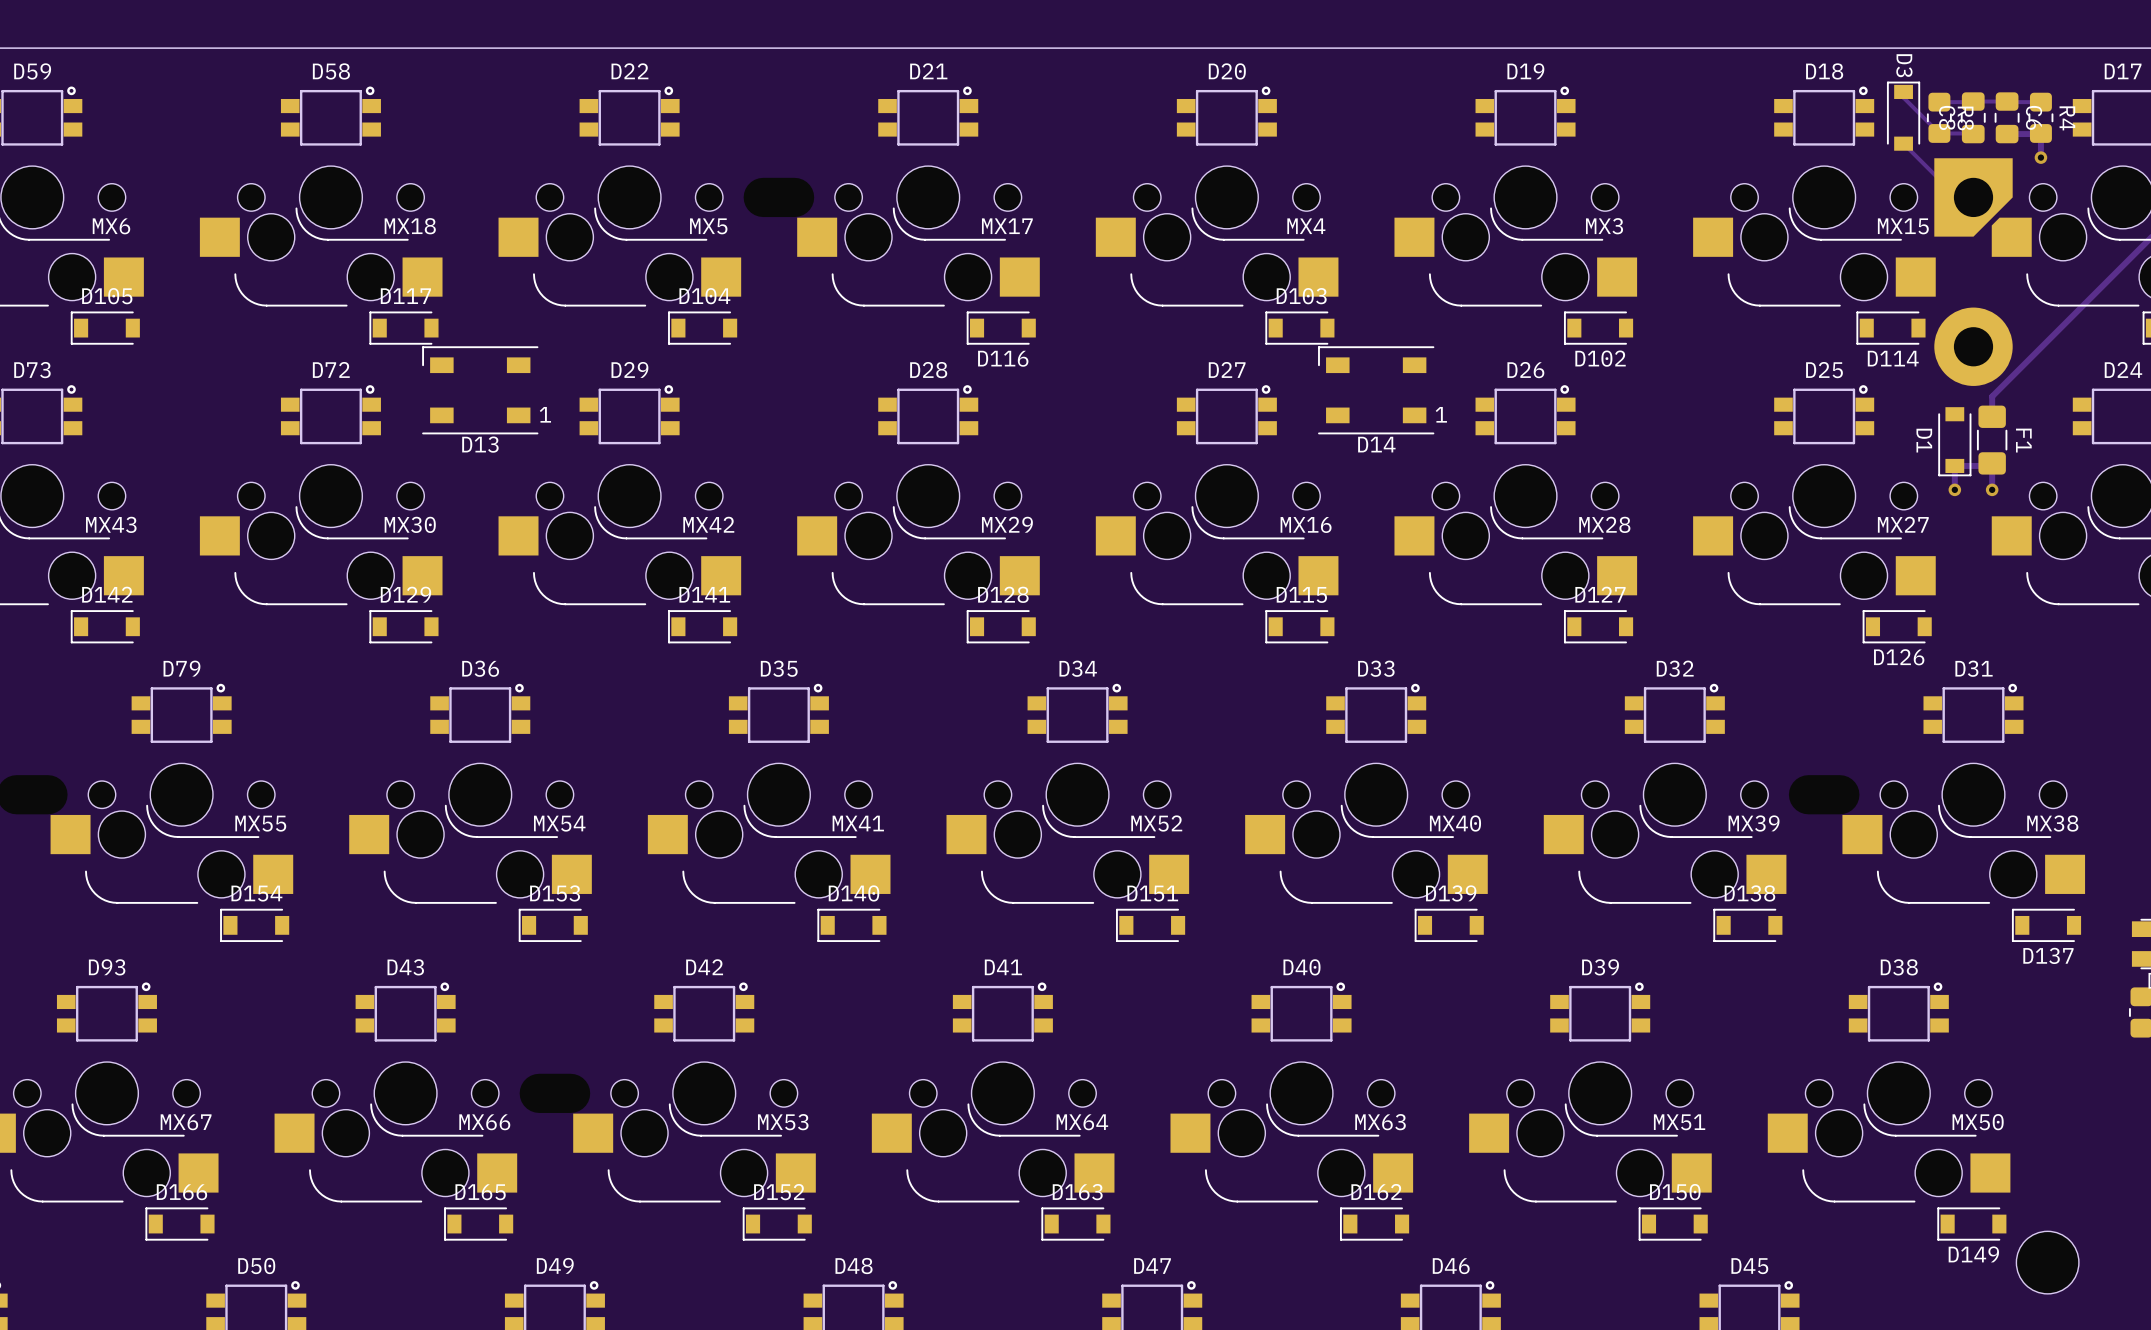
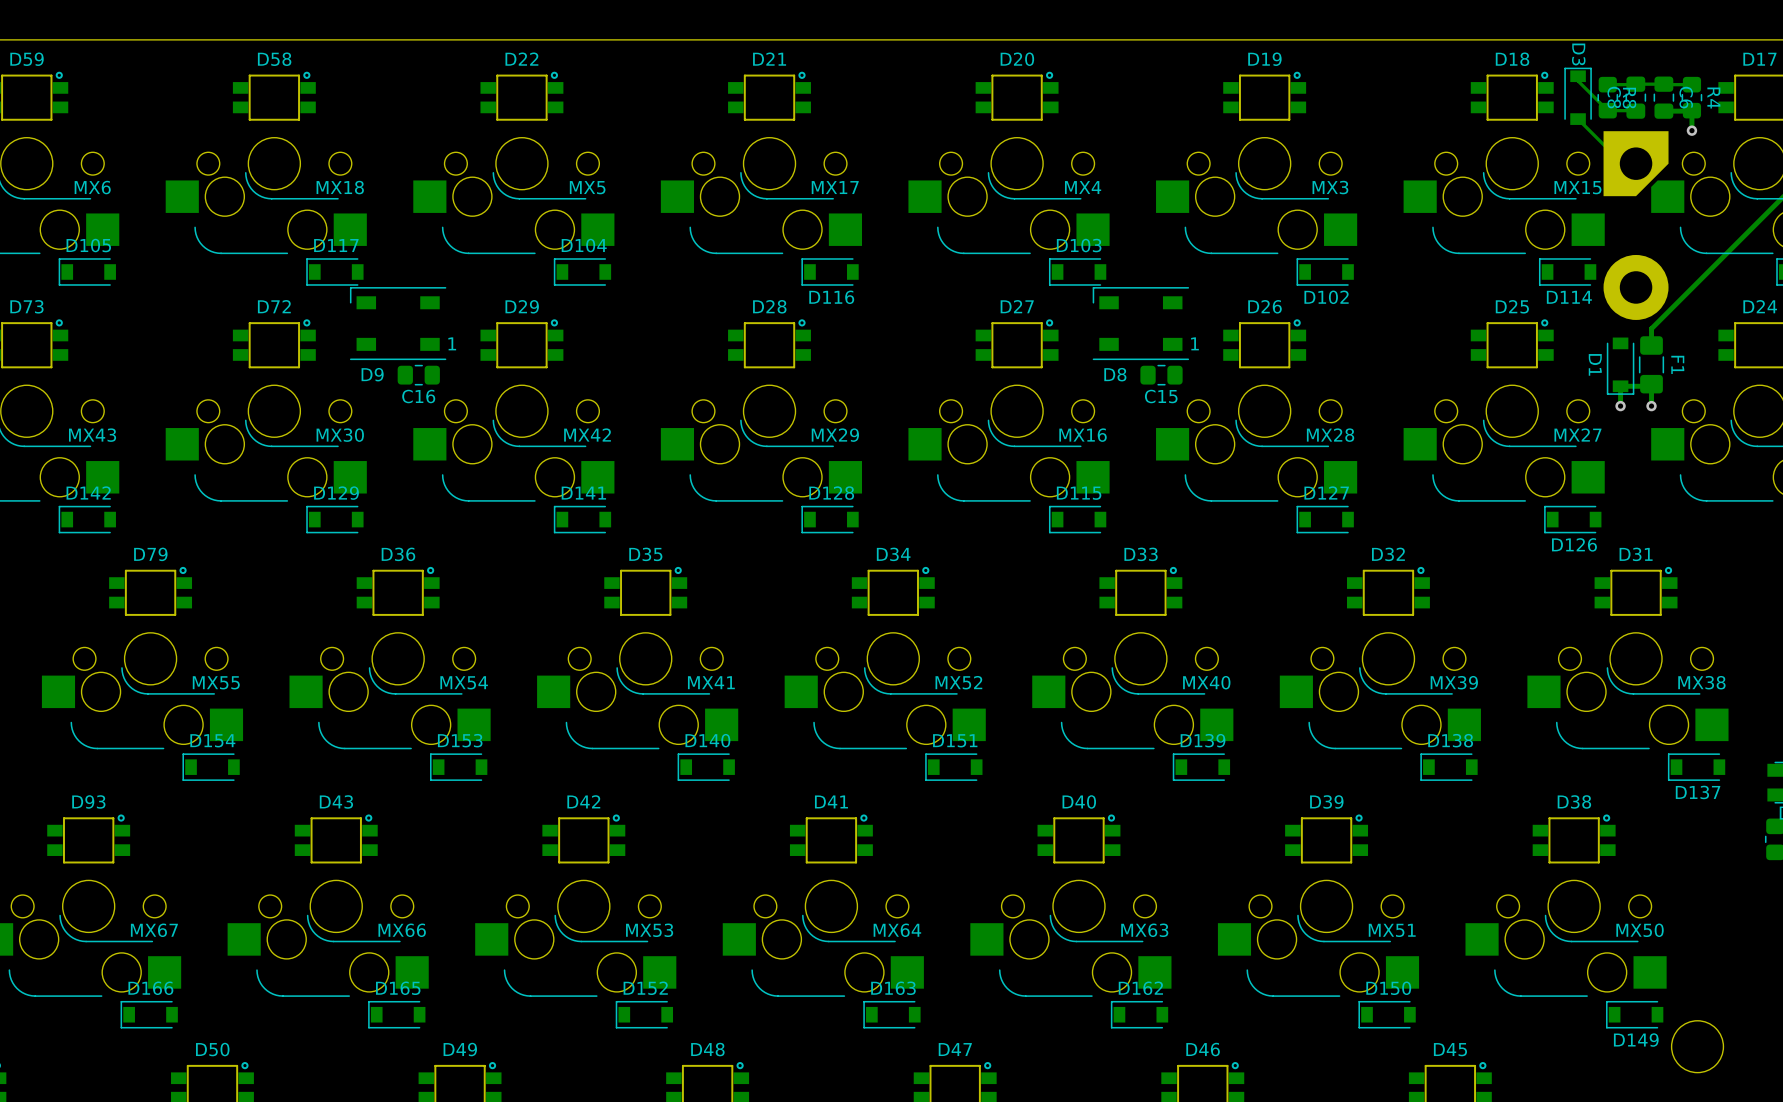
D13 name: D13 (480, 444) -> D9 (372, 374)
D14 name: D14 (1376, 444) -> D8 (1115, 374)
C16: none -> (418, 375)
C15: none -> (1161, 375)

